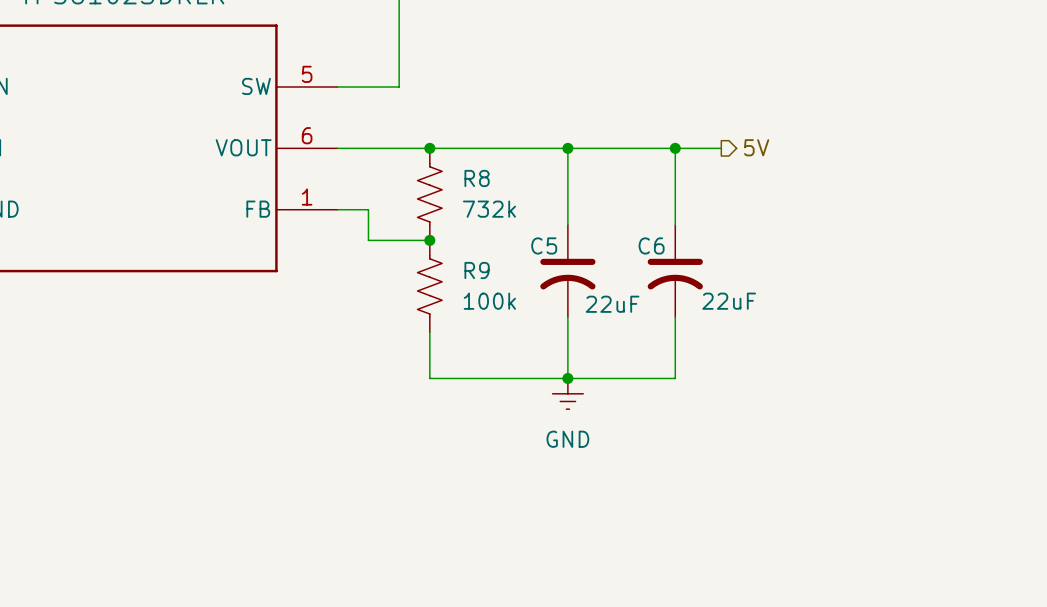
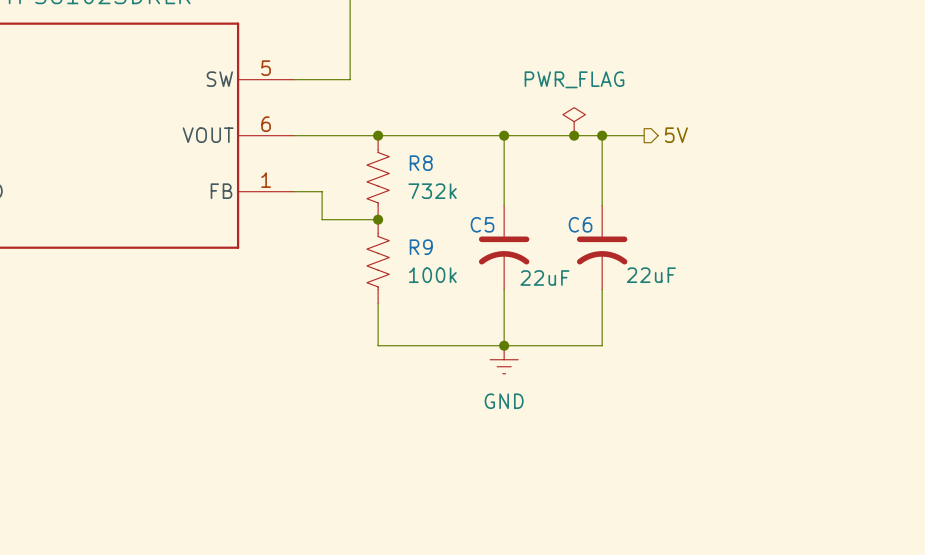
power symbol: none -> PWR_FLAG (574, 121)
junction: none -> (574, 135)

